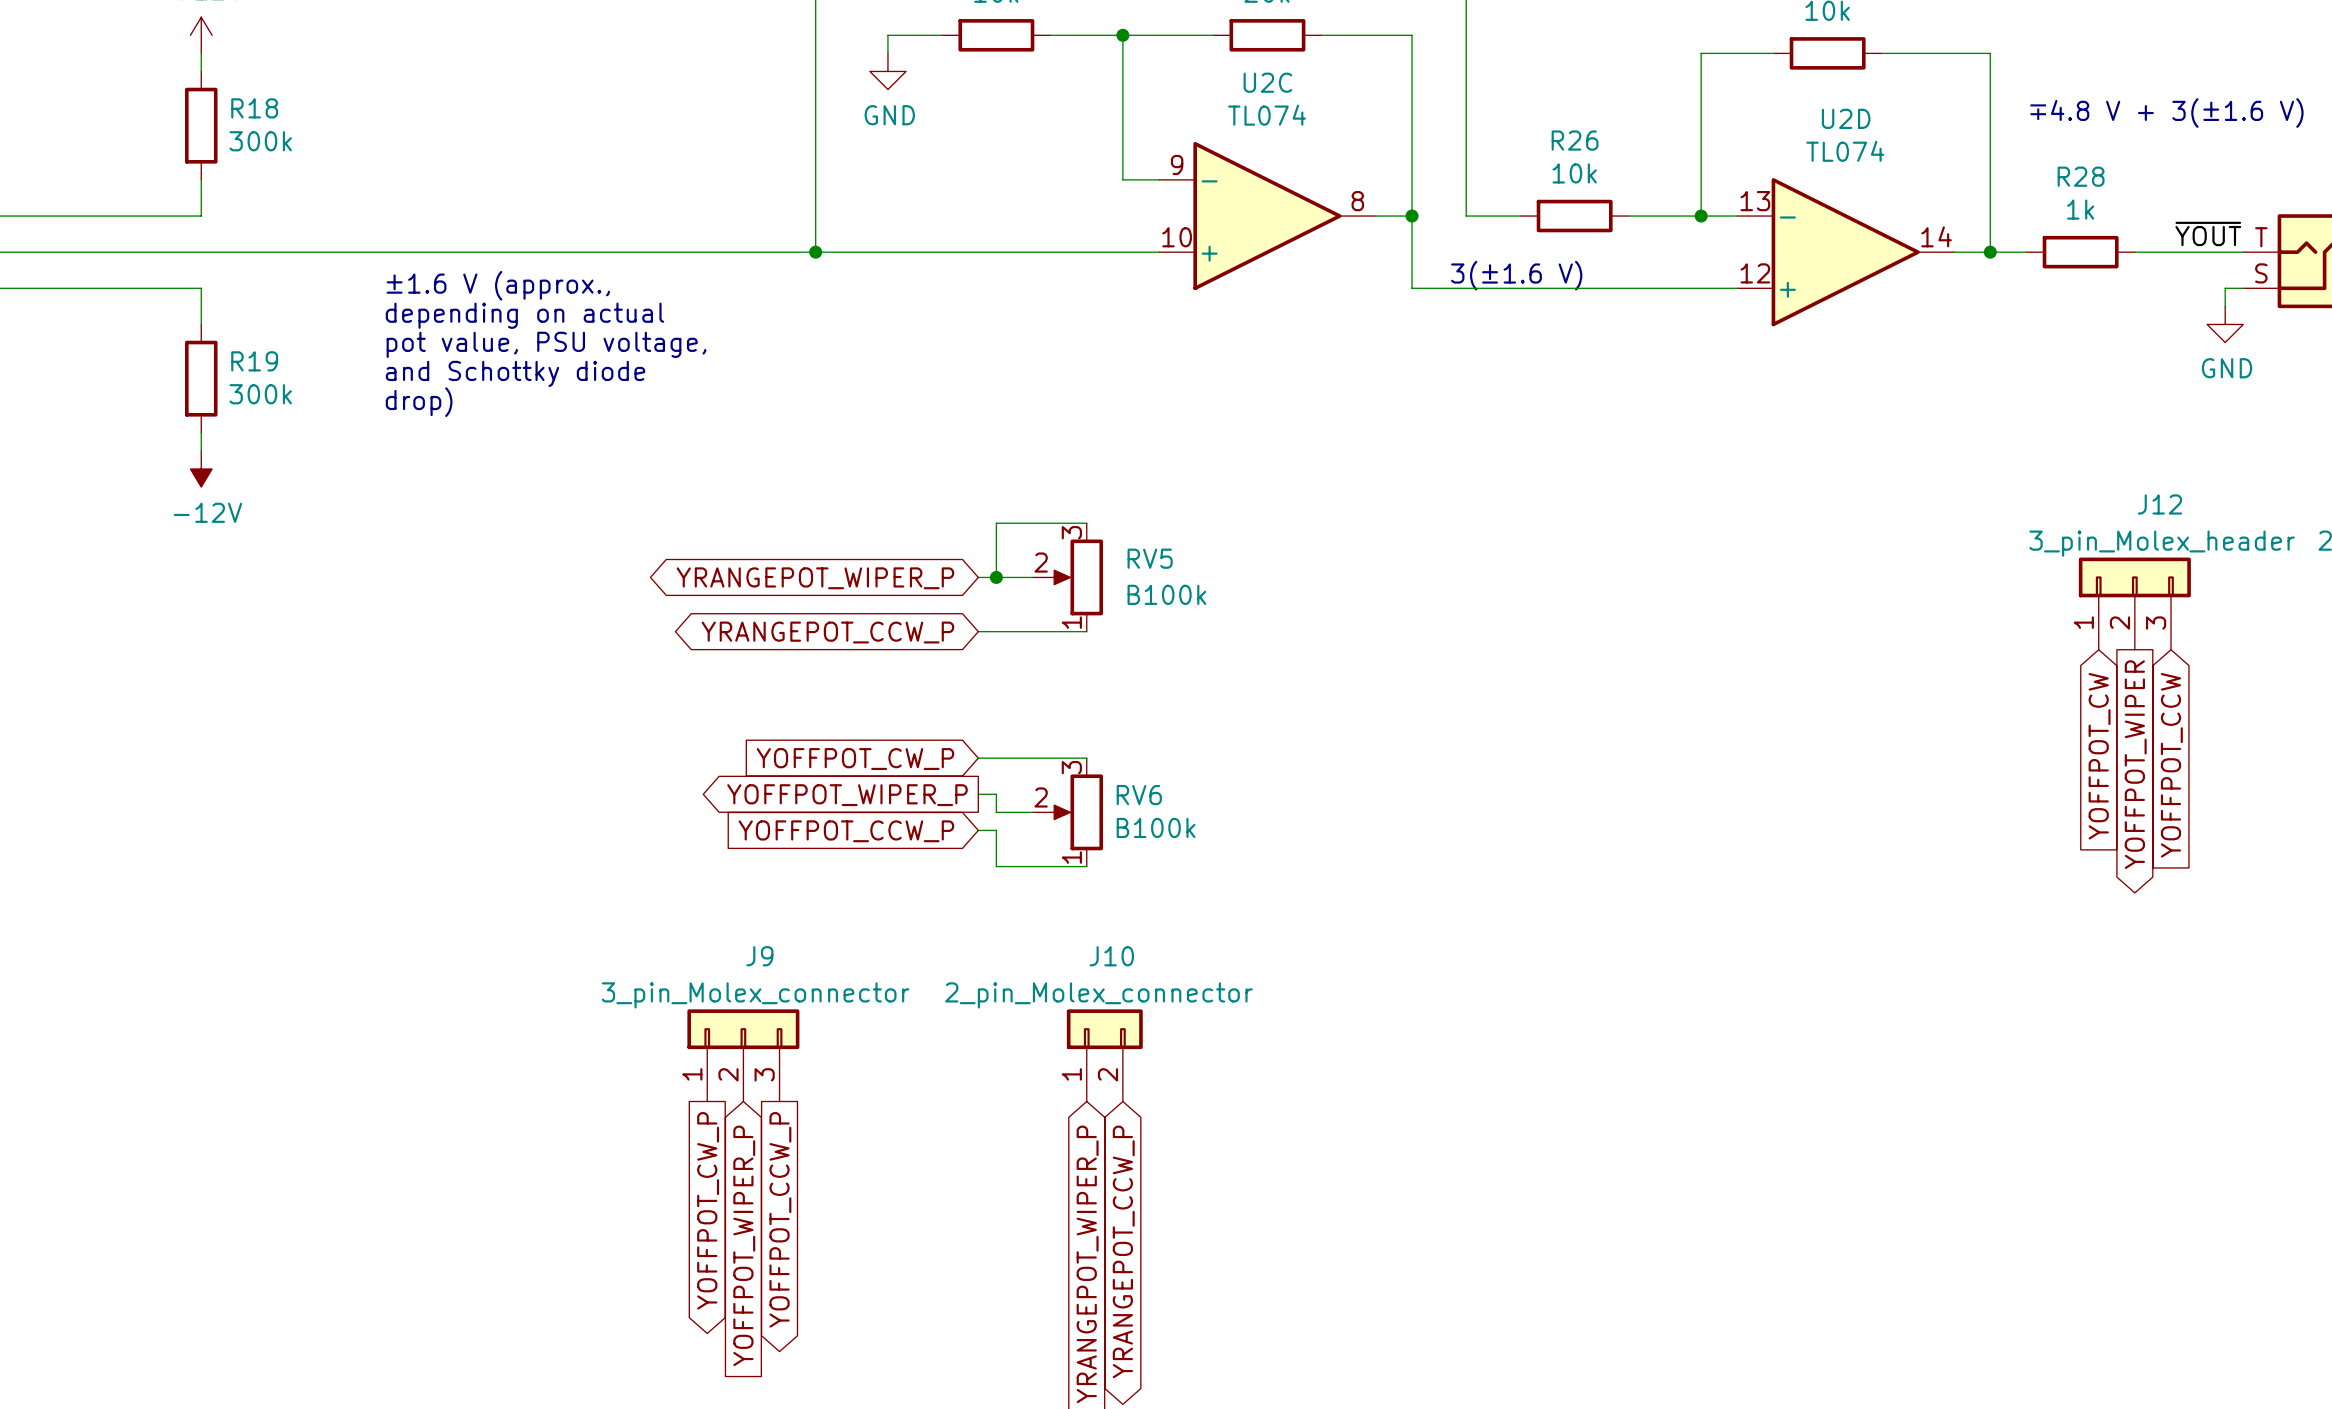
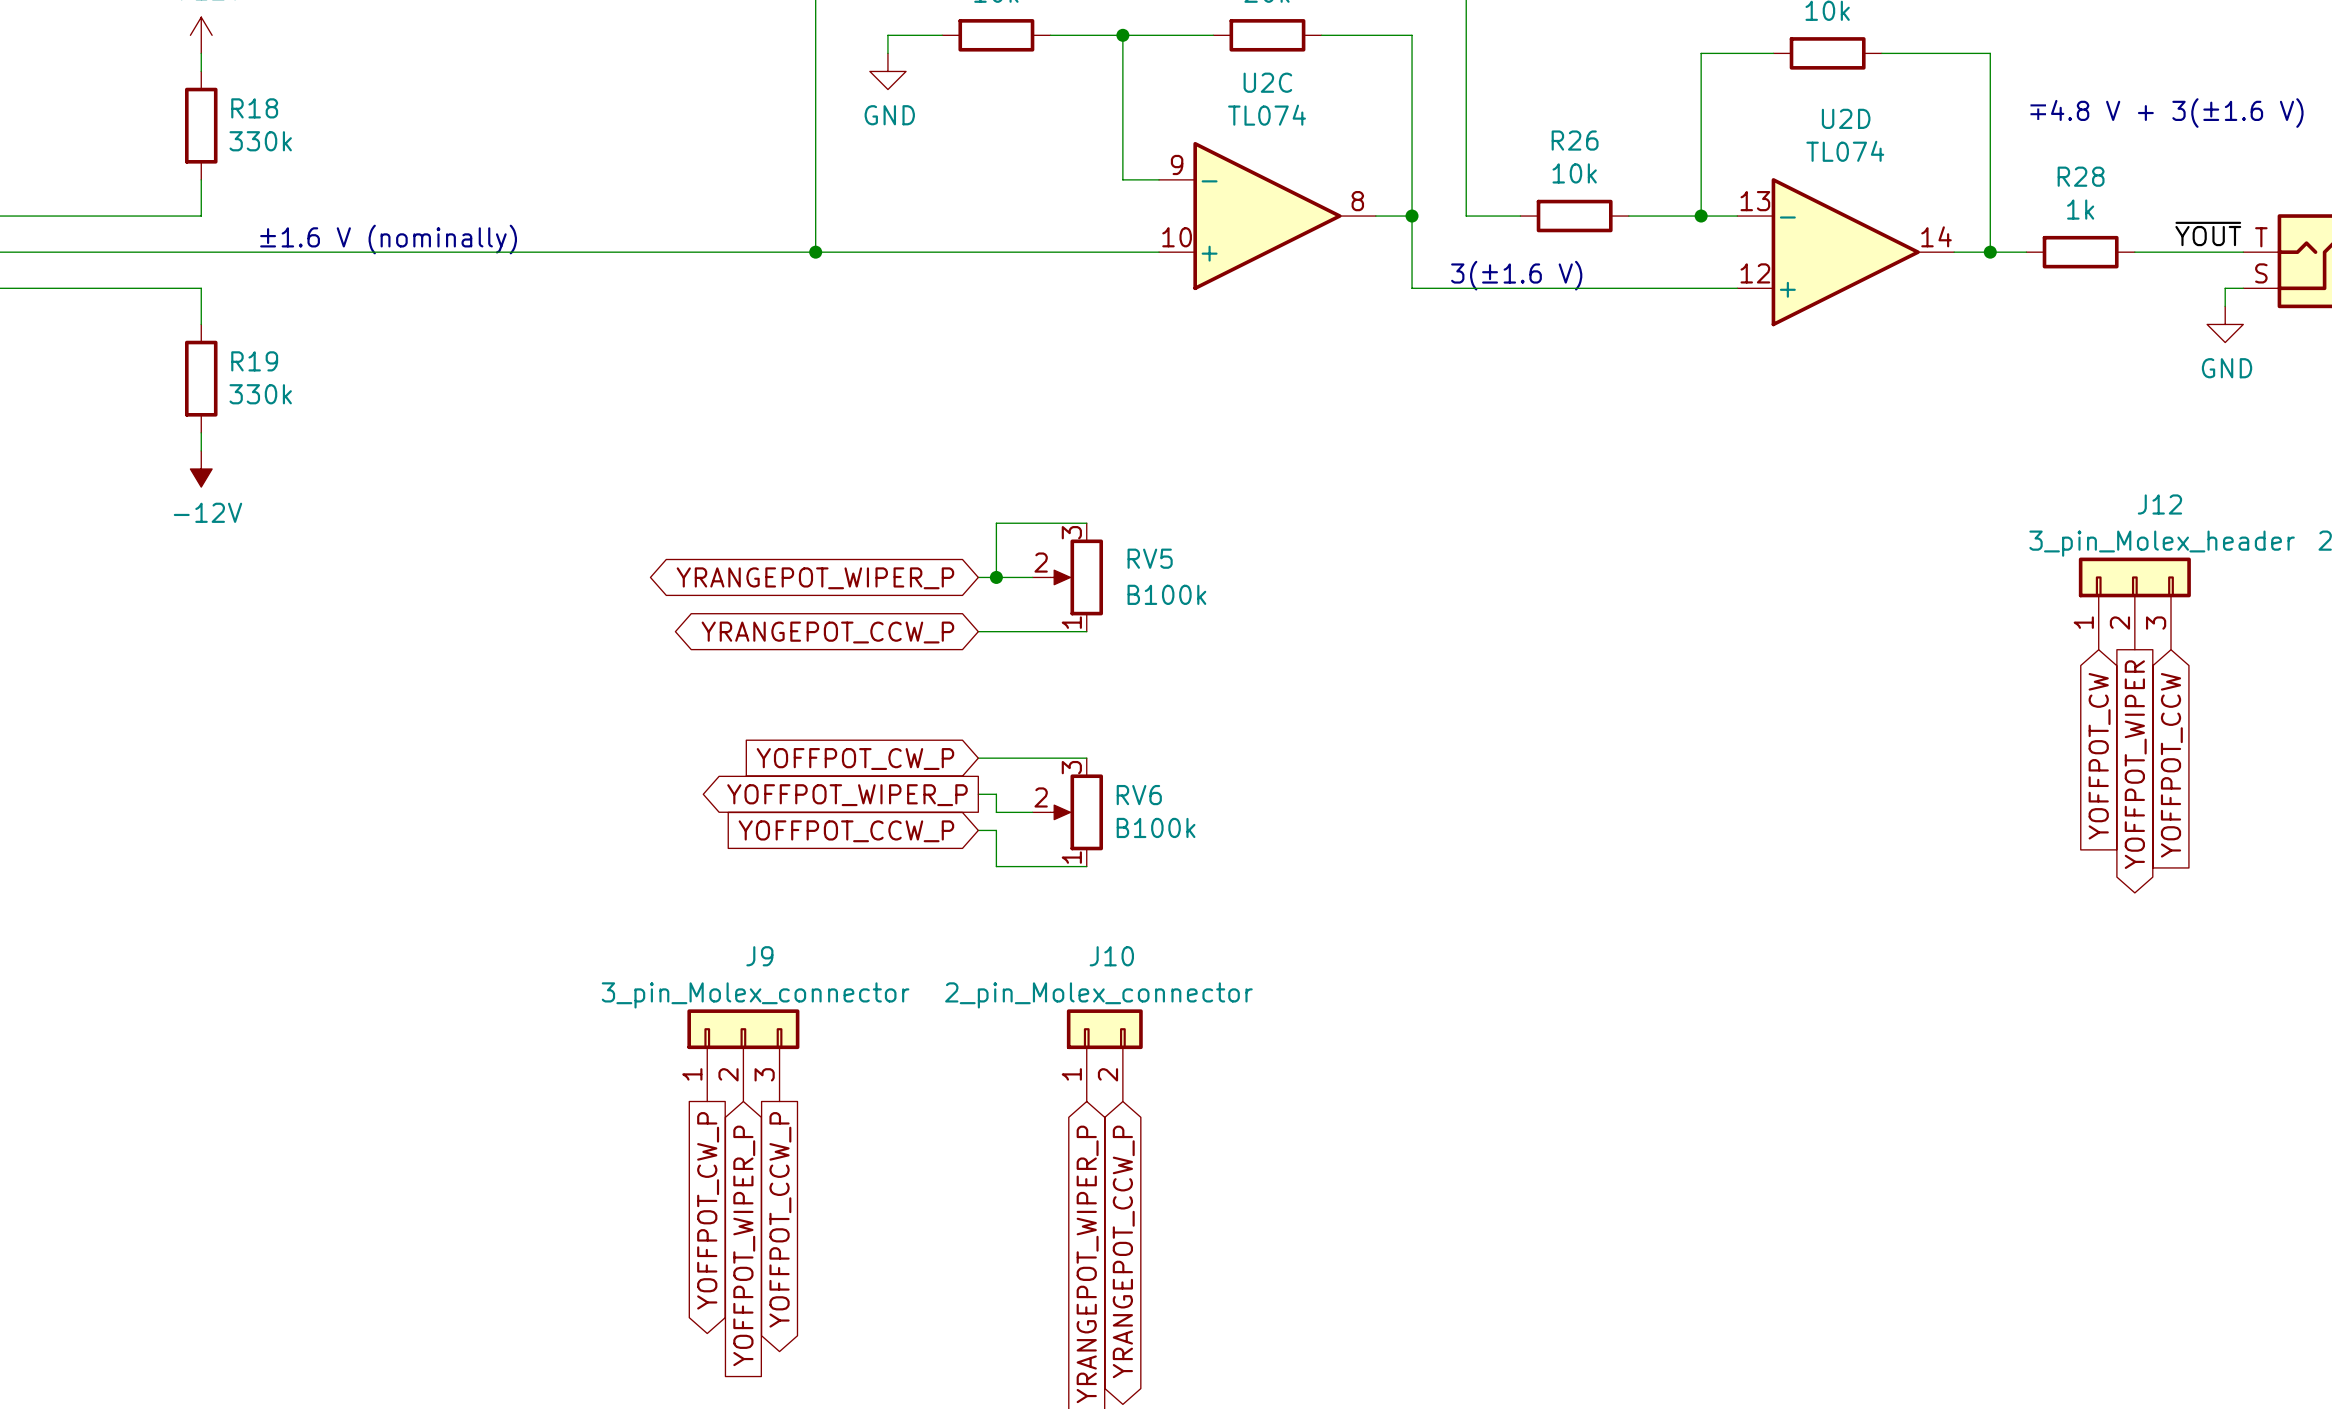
R18 value: 300k (260, 141) -> 330k (260, 141)
text: none -> ±1.6 V (nominally) (388, 239)
text: ±1.6 V (approx., (498, 285) -> none
text: depending on actual (524, 315) -> none
text: pot value, PSU voltage, (546, 344) -> none
text: and Schottky diode (515, 373) -> none
R19 value: 300k (260, 394) -> 330k (260, 394)
text: drop) (419, 402) -> none

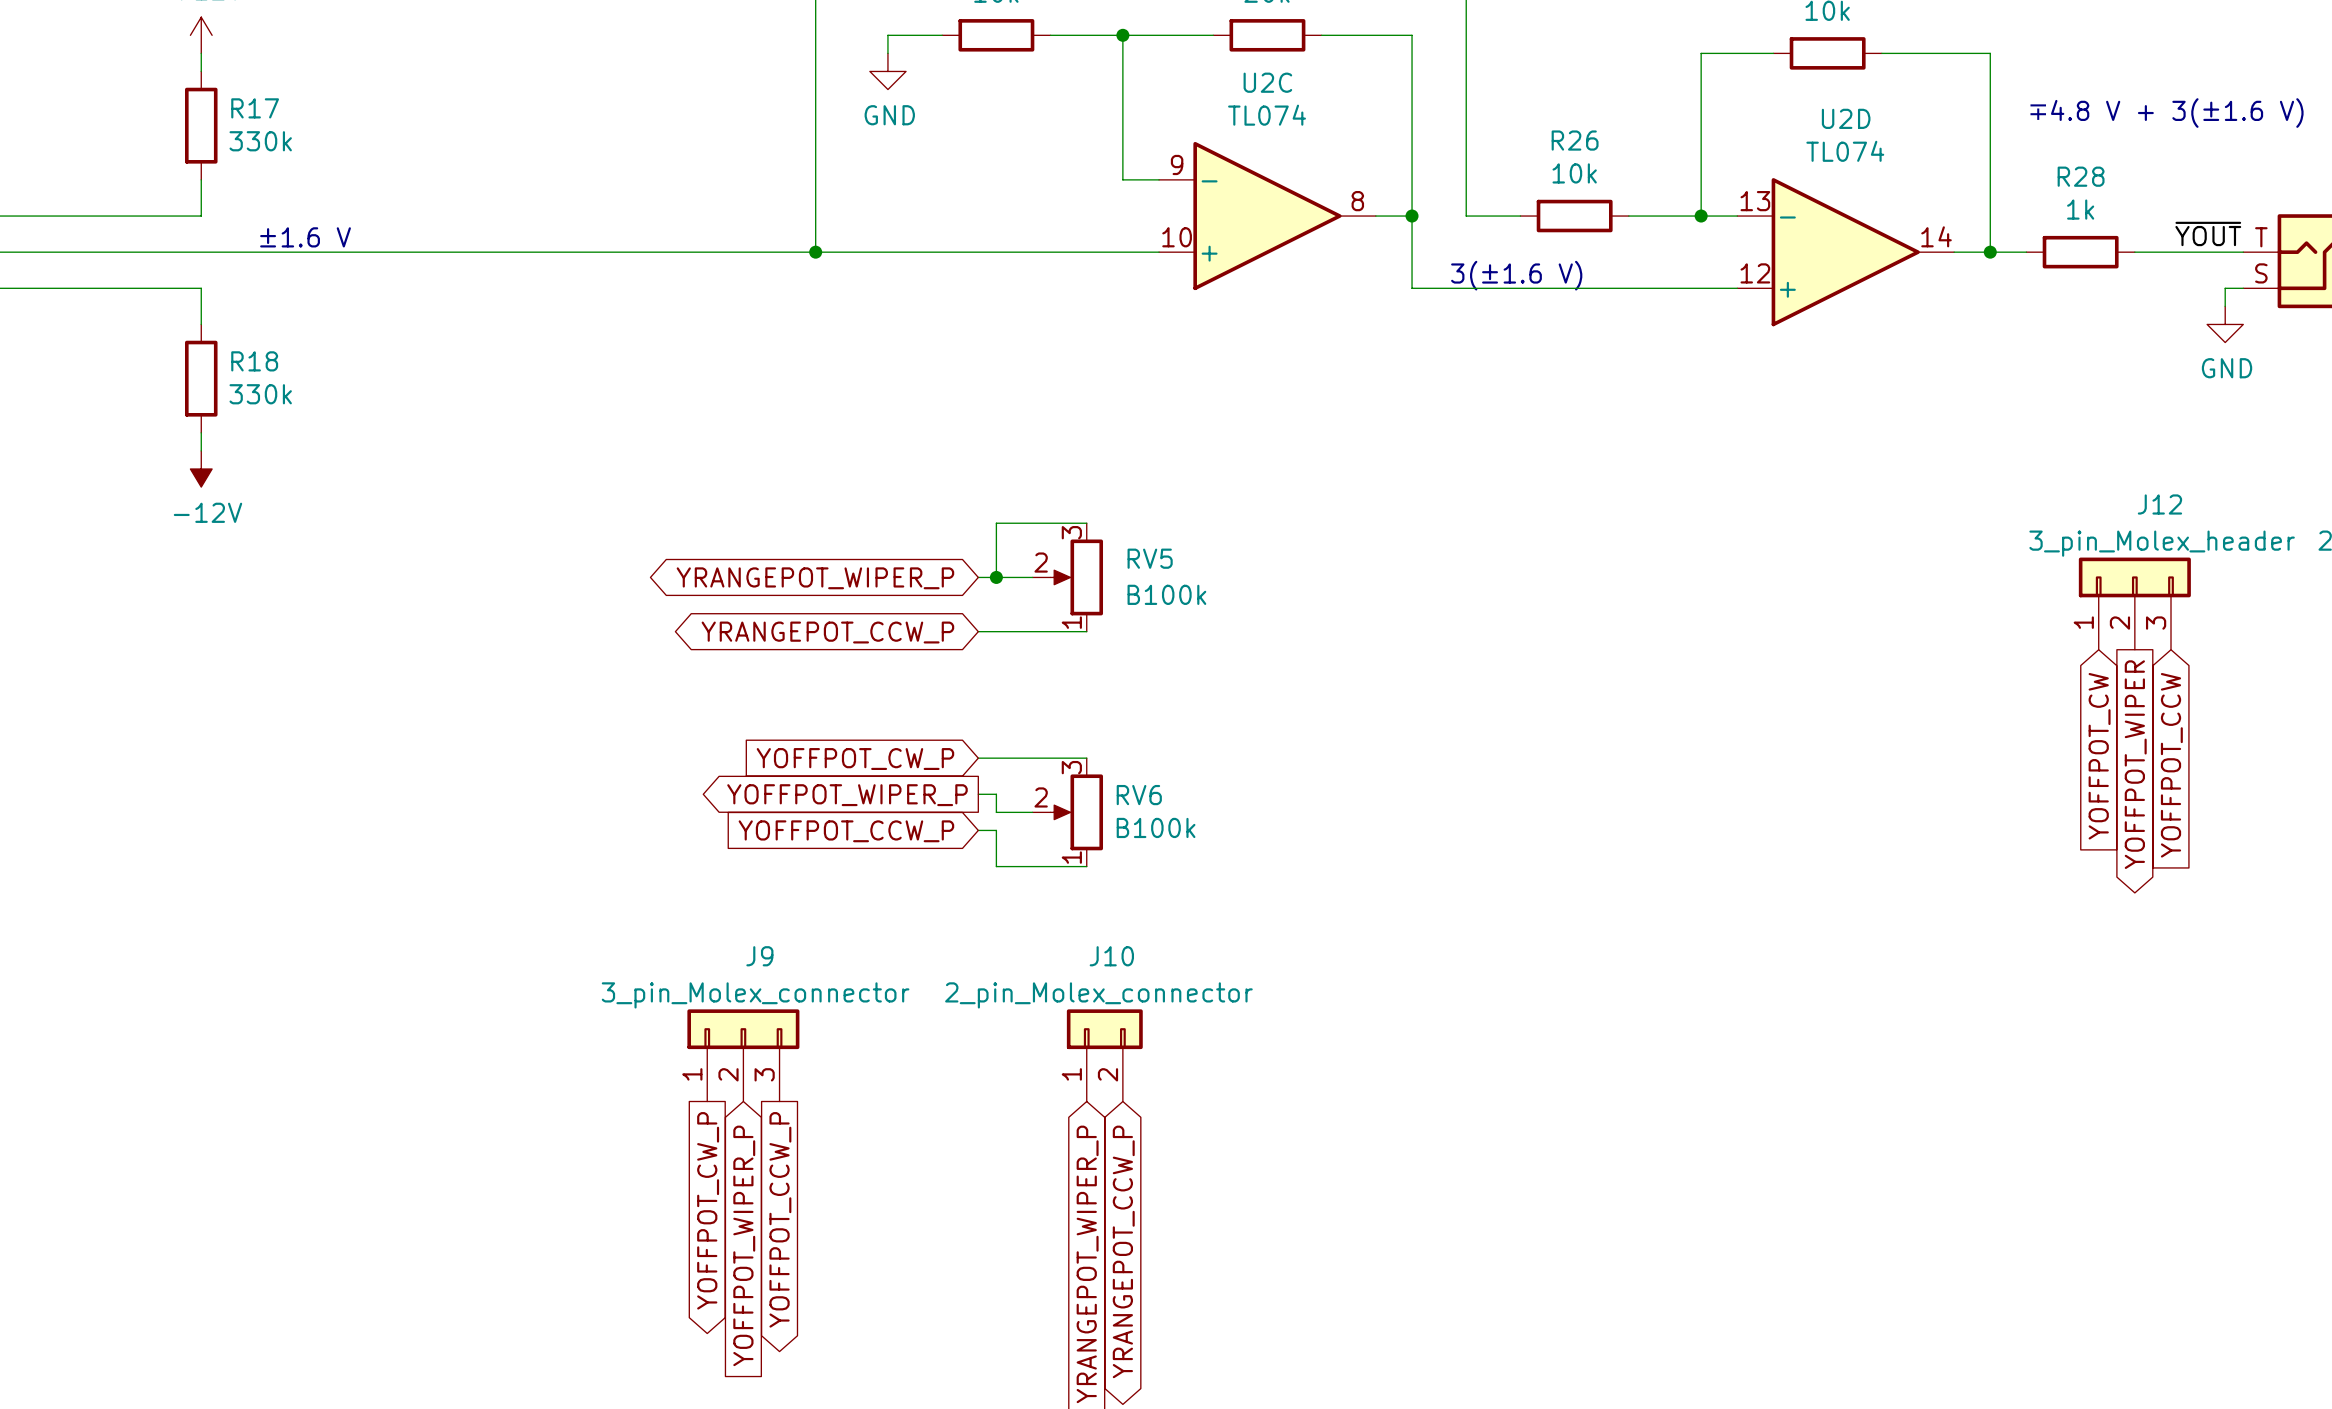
R18 name: R18 (254, 108) -> R17 (255, 108)
text: ±1.6 V (nominally) (388, 239) -> ±1.6 V (305, 237)
R19 name: R19 (254, 361) -> R18 (254, 361)

